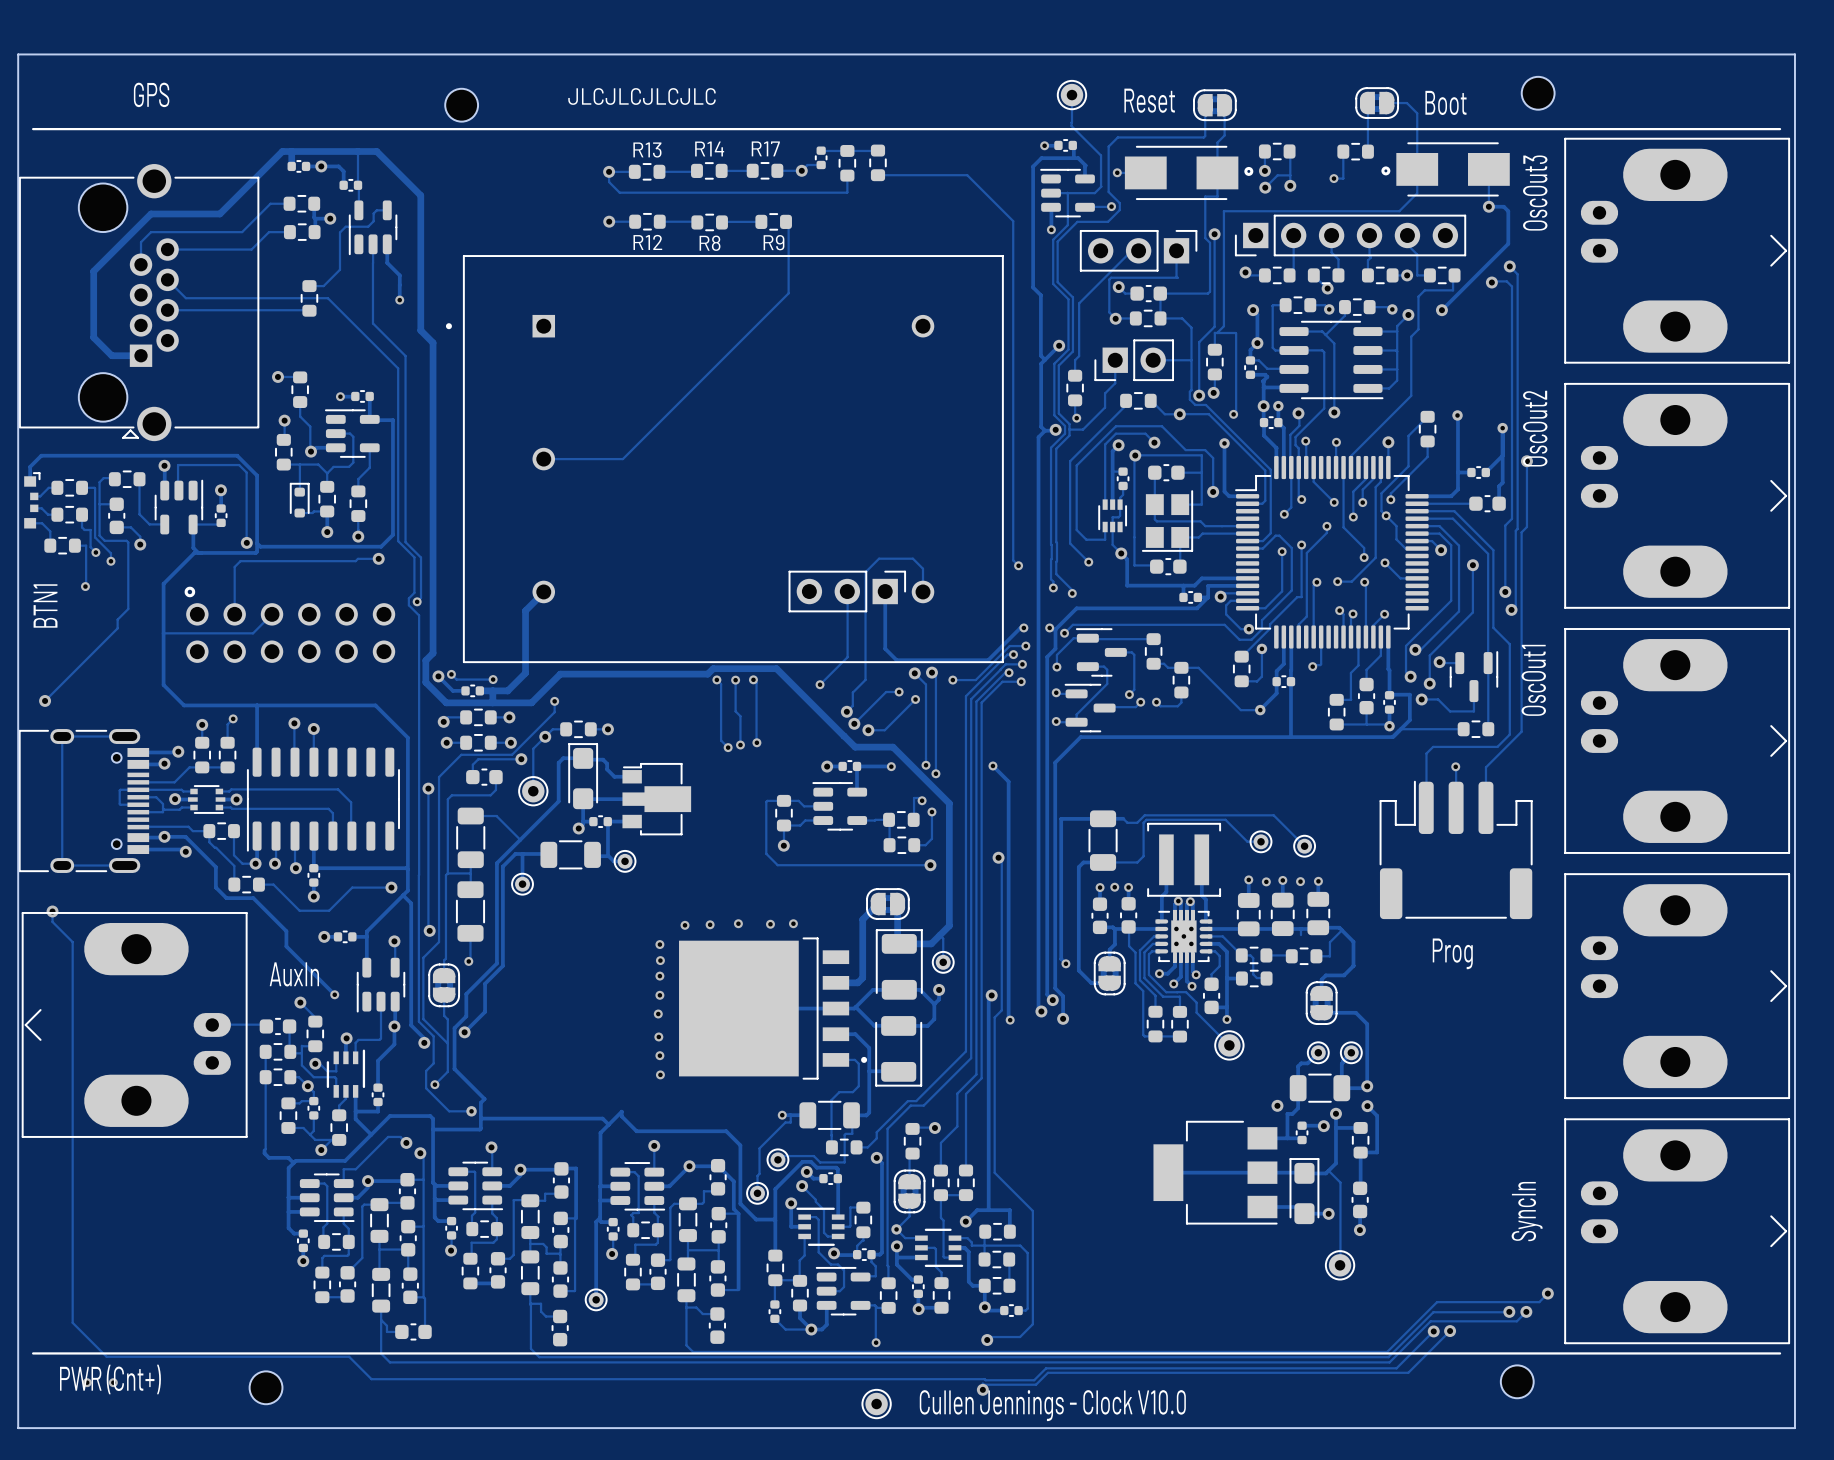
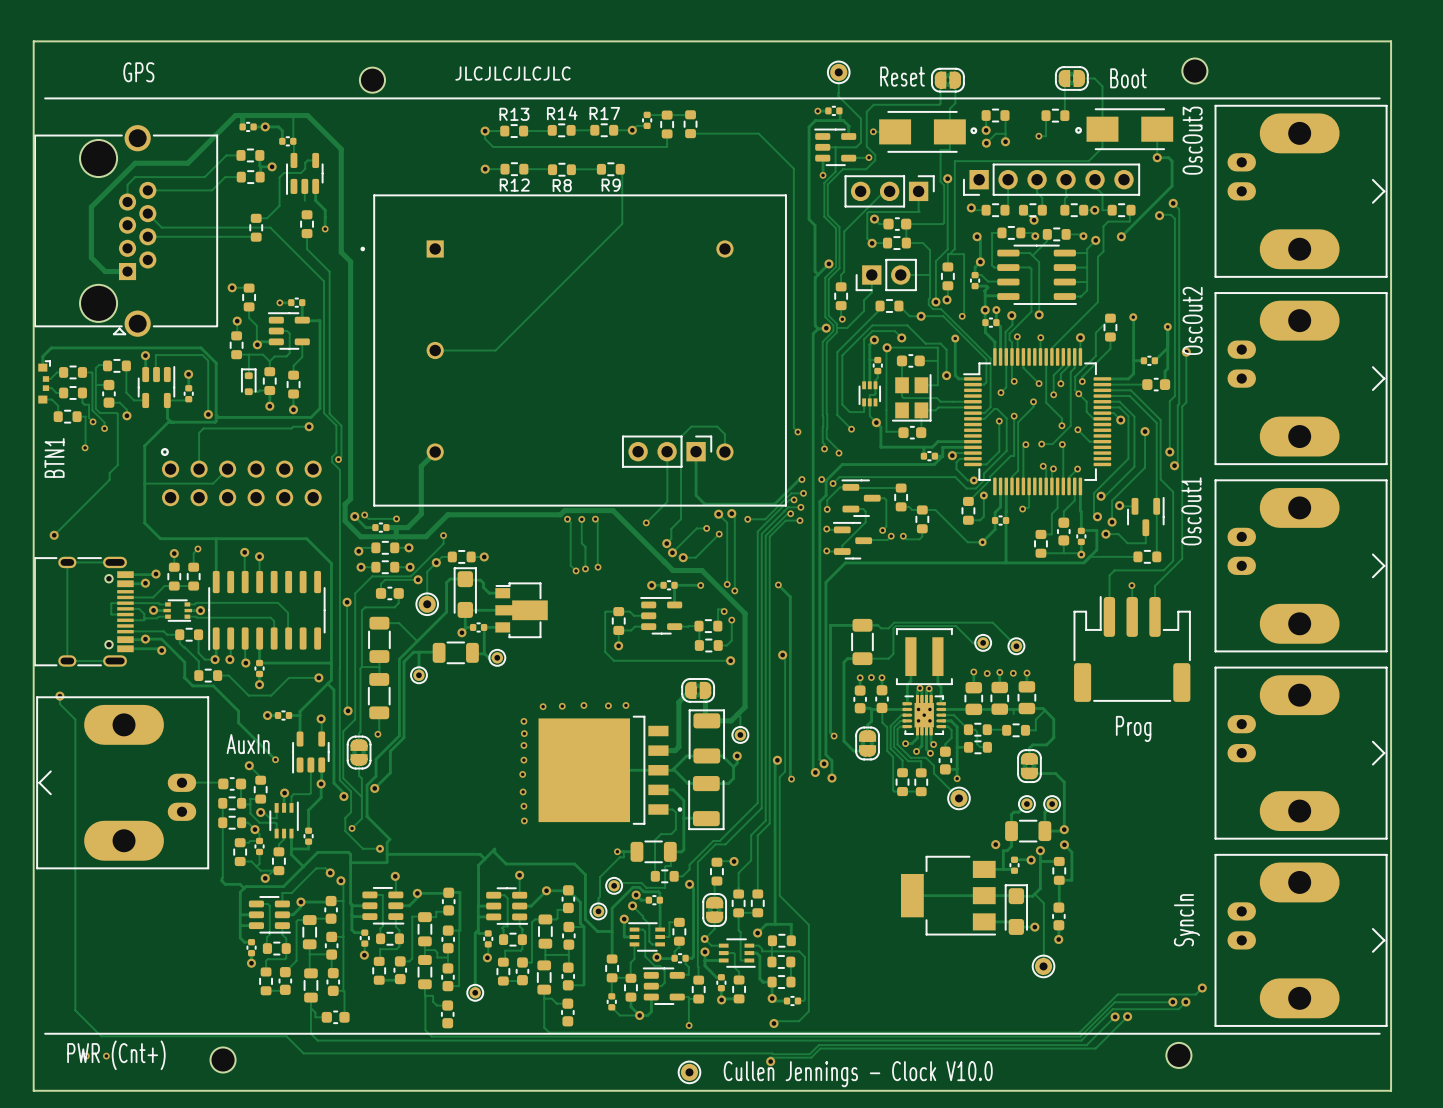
track: (372, 263) (372, 323) (376, 326) -> (307, 233) (307, 249)
part: none -> (307, 224)

